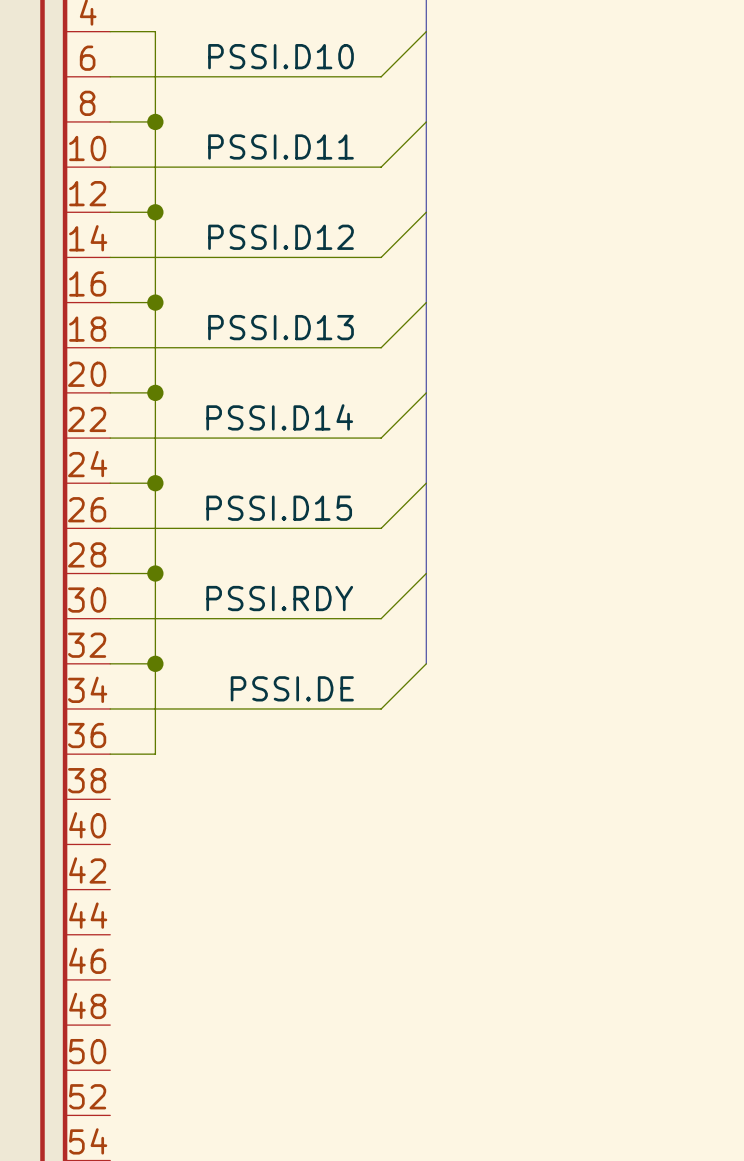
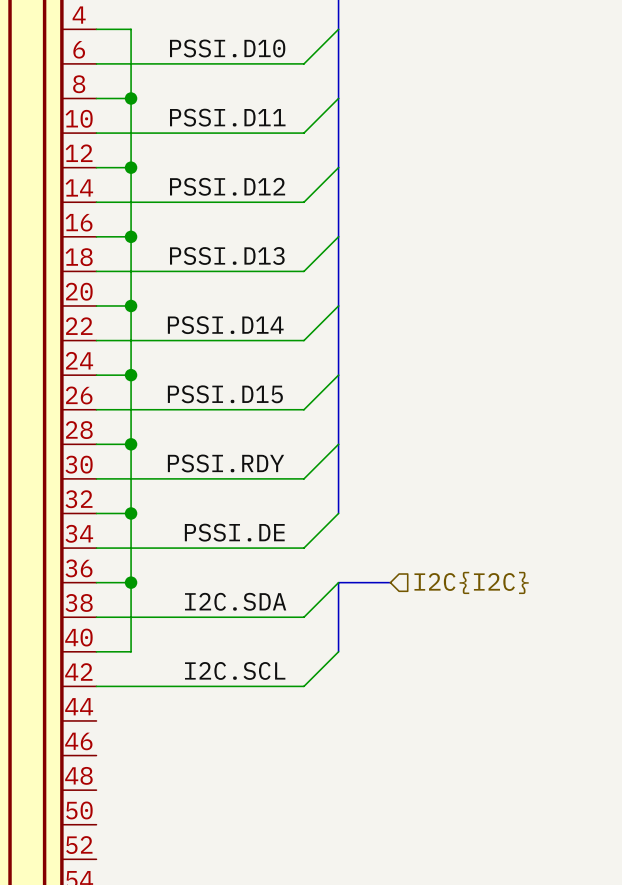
wire: none -> (131, 582) (131, 651) (96, 651)
junction: none -> (131, 582)
wire: none -> (338, 582) (303, 617) (96, 617)
bus: none -> (390, 582) (338, 582) (338, 651)
hierarchical label: none -> I2C{I2C} (471, 582)
label: none -> I2C.SDA (235, 601)
wire: none -> (338, 651) (303, 686) (96, 686)
label: none -> I2C.SCL (235, 670)

